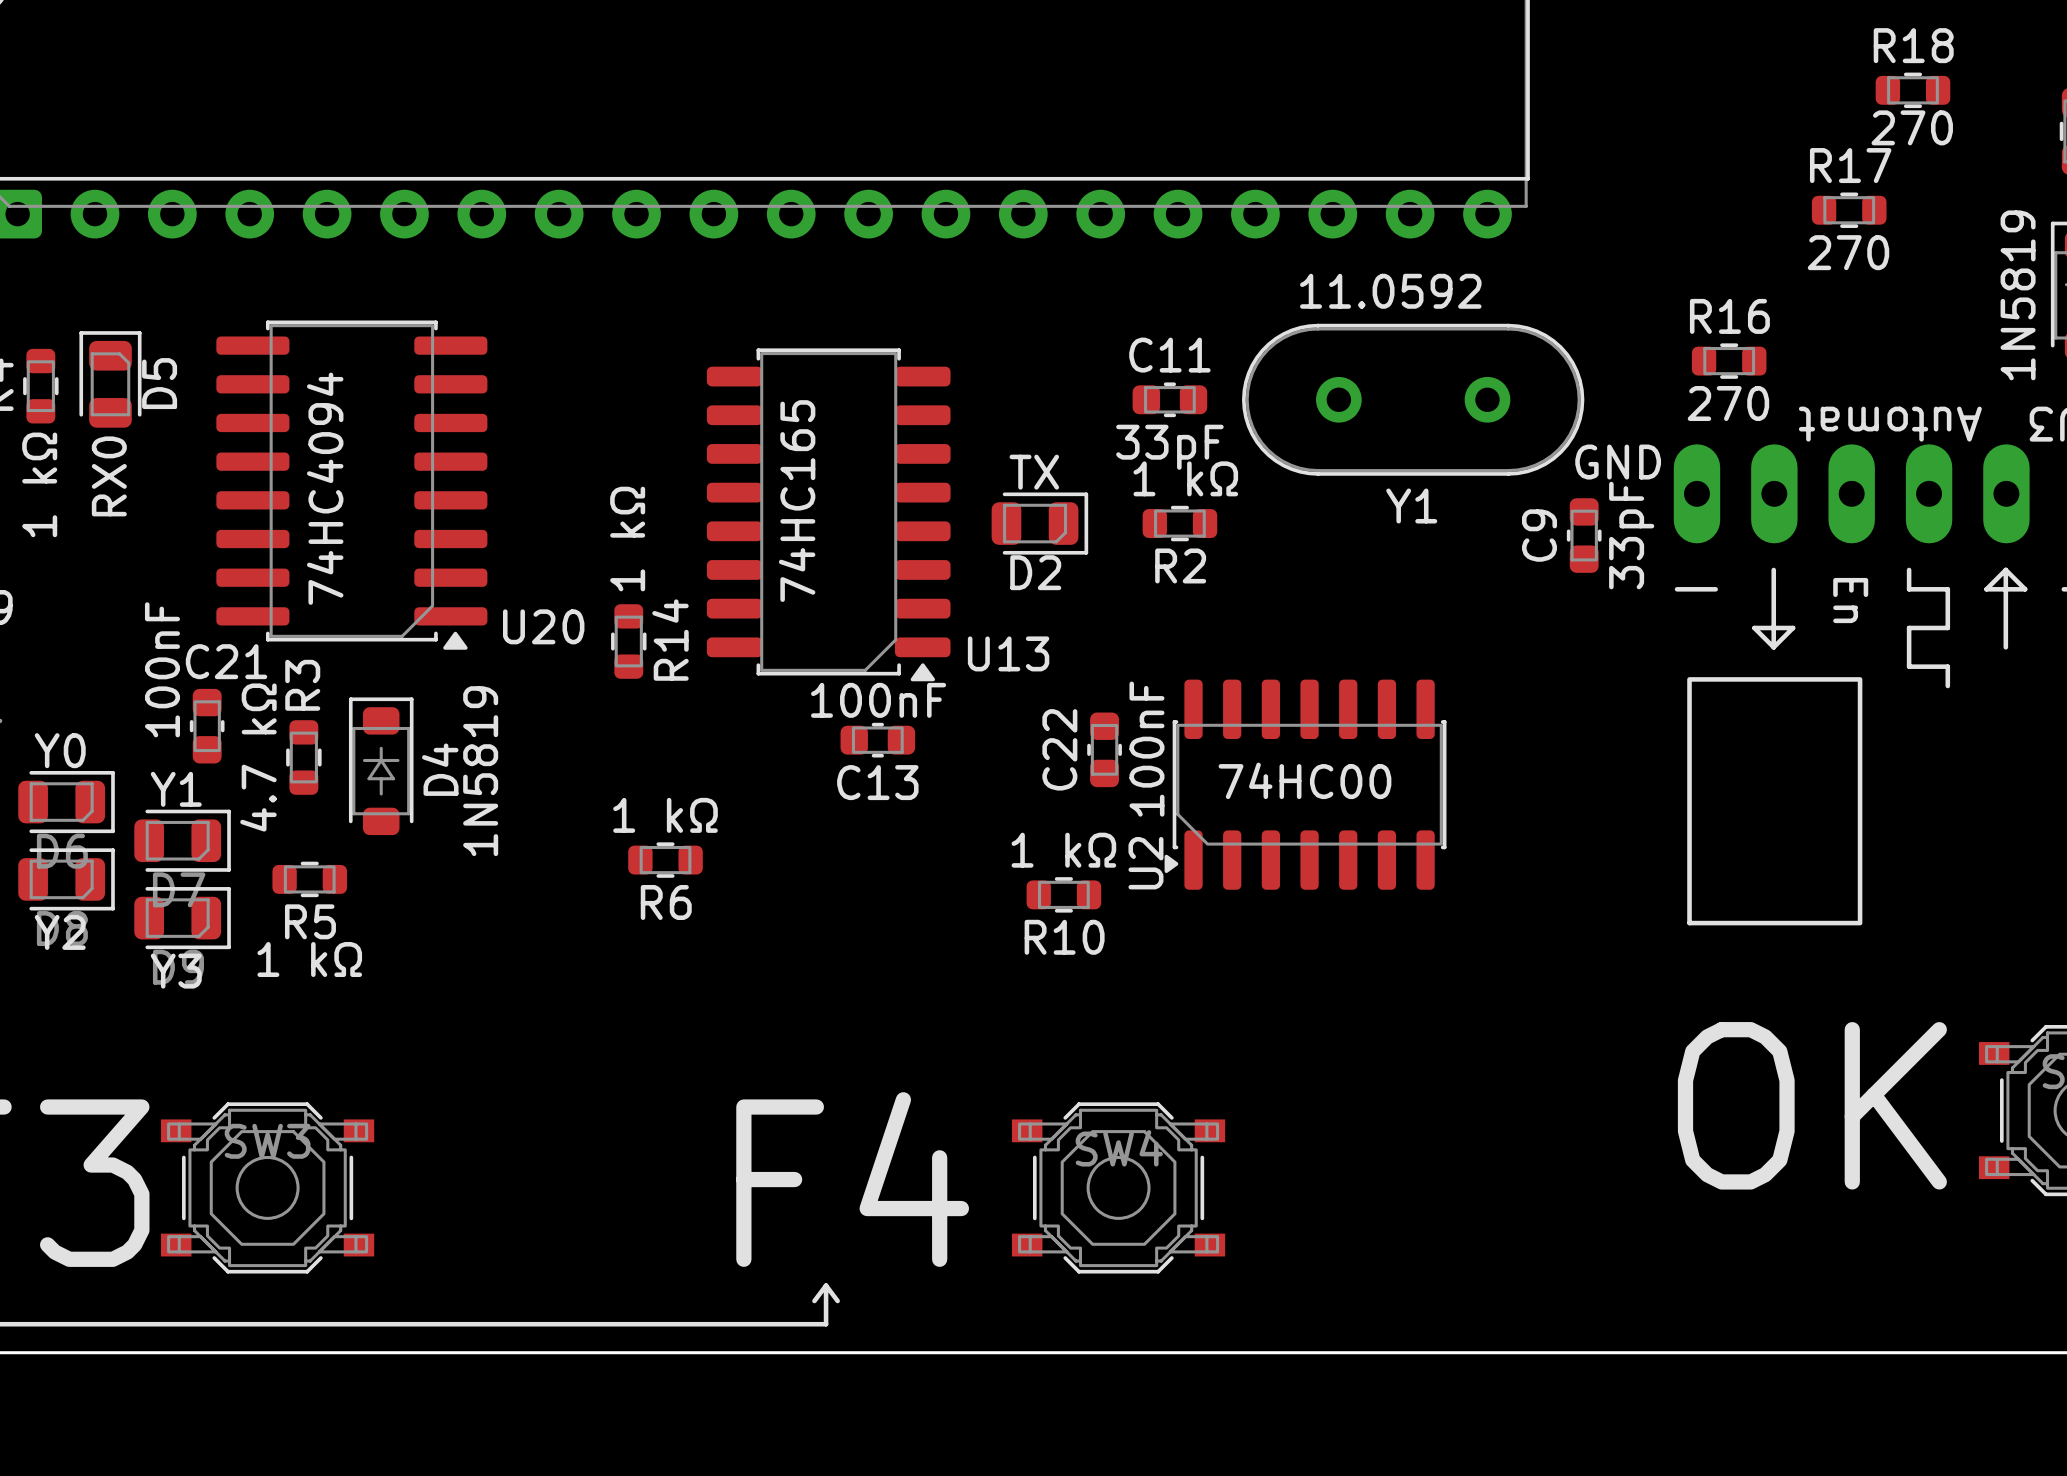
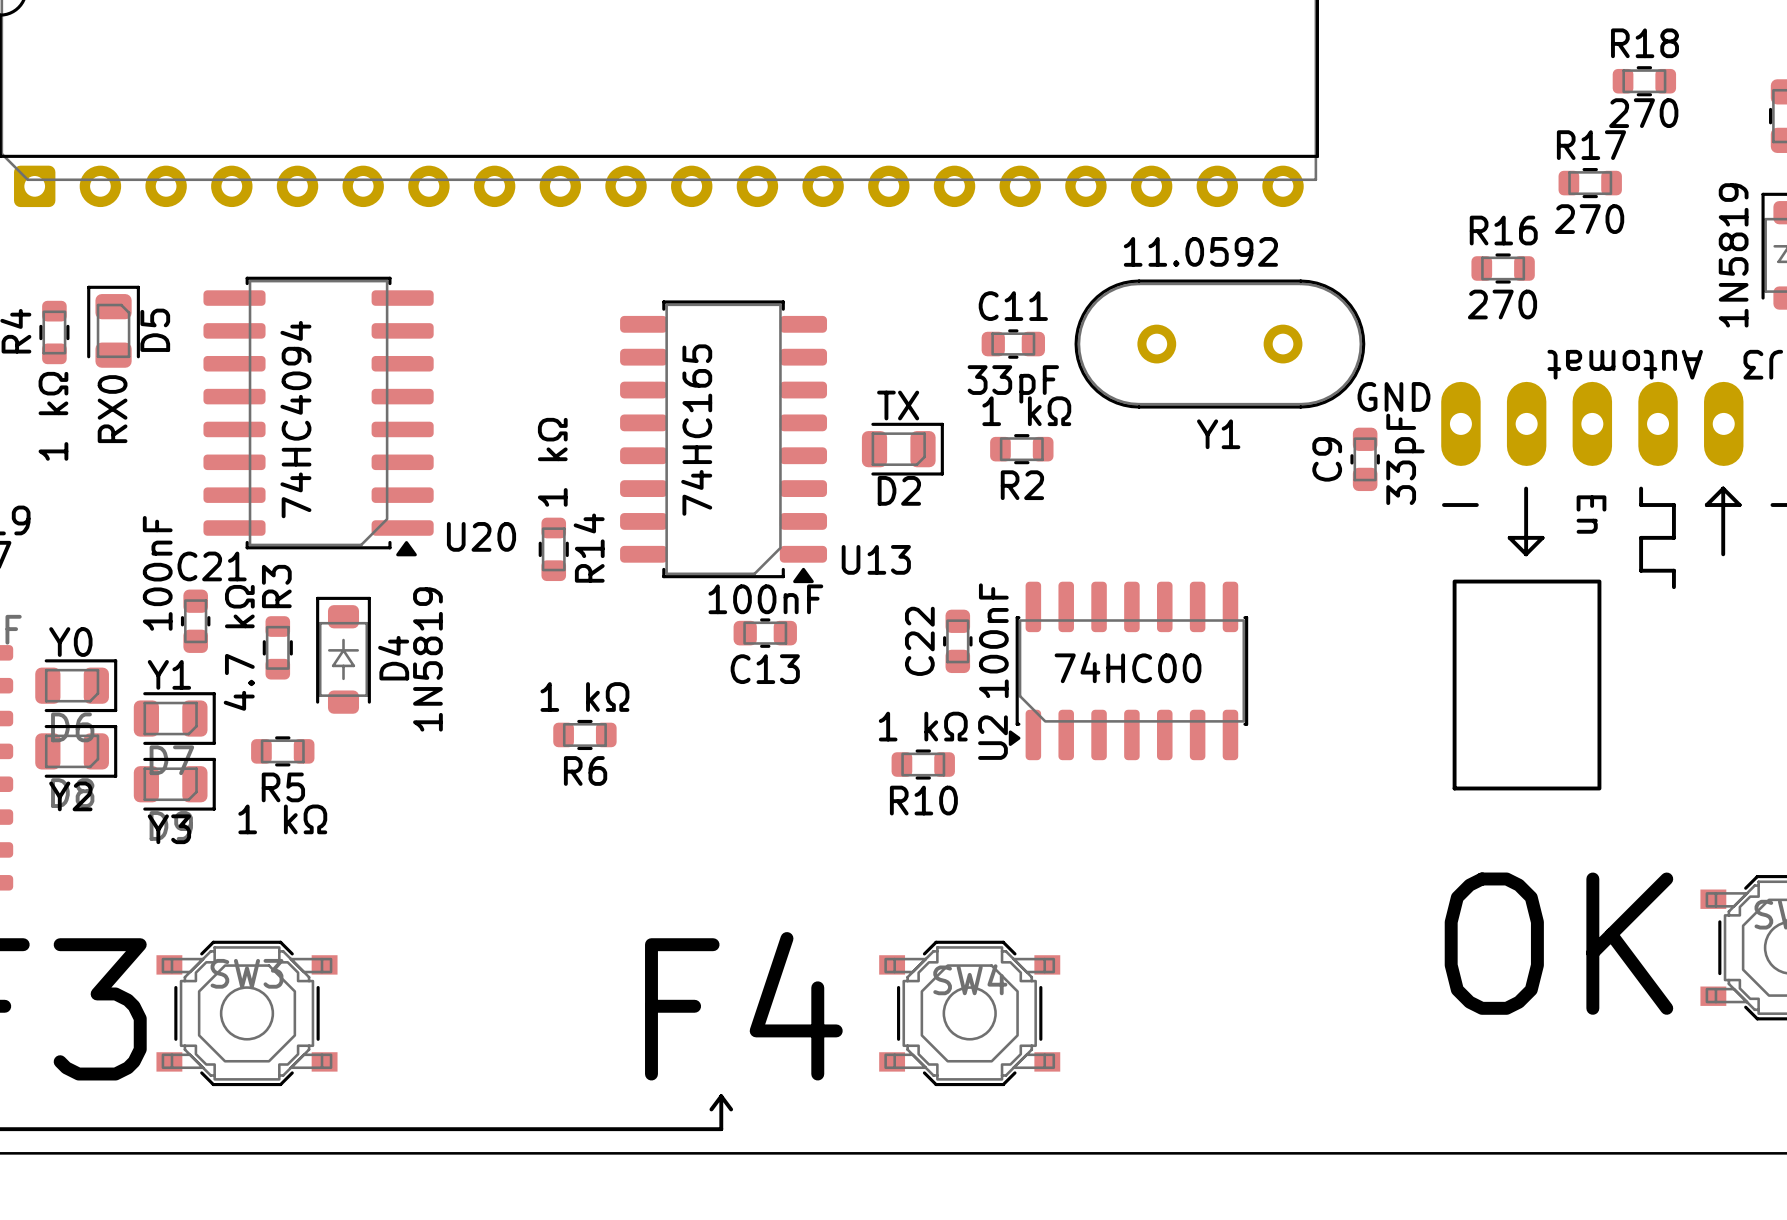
R16 position: (1729, 361) -> (1503, 268)

